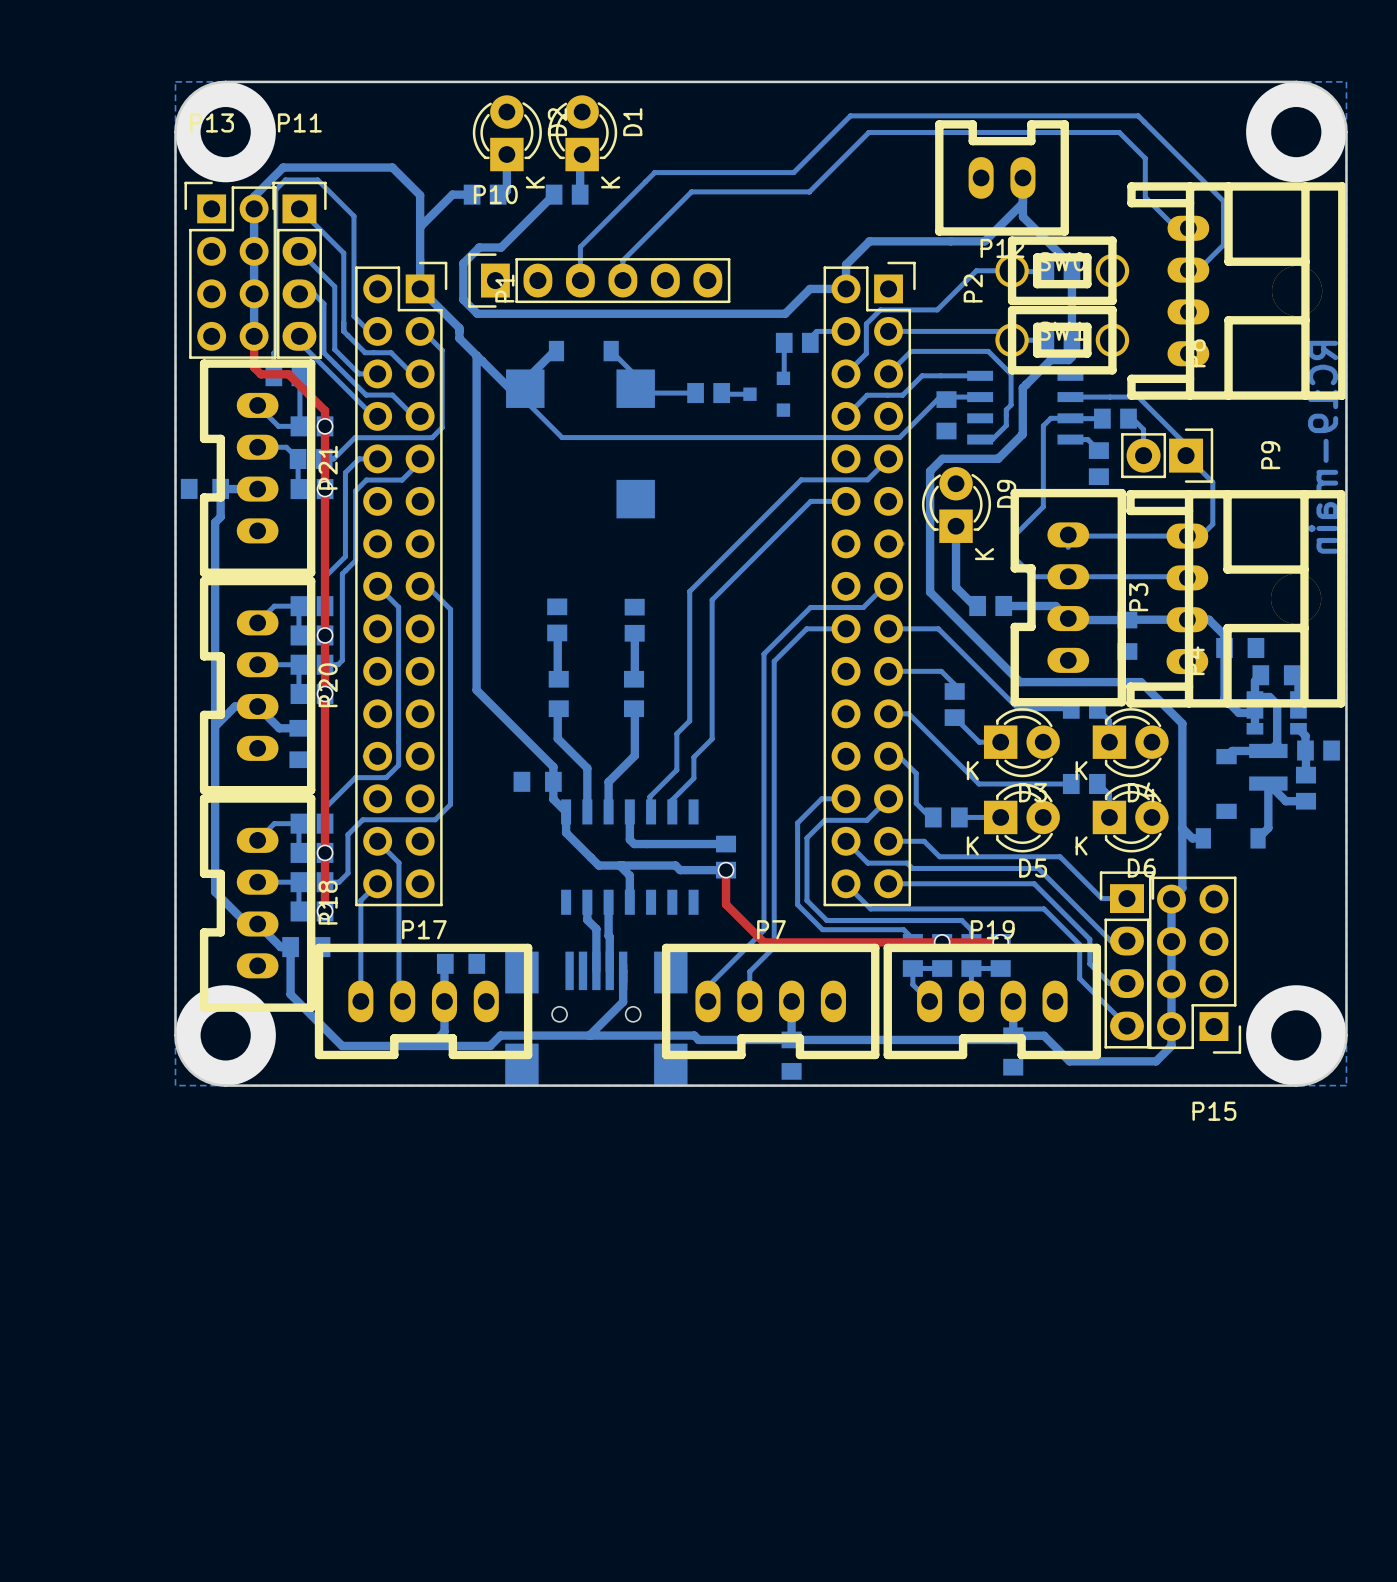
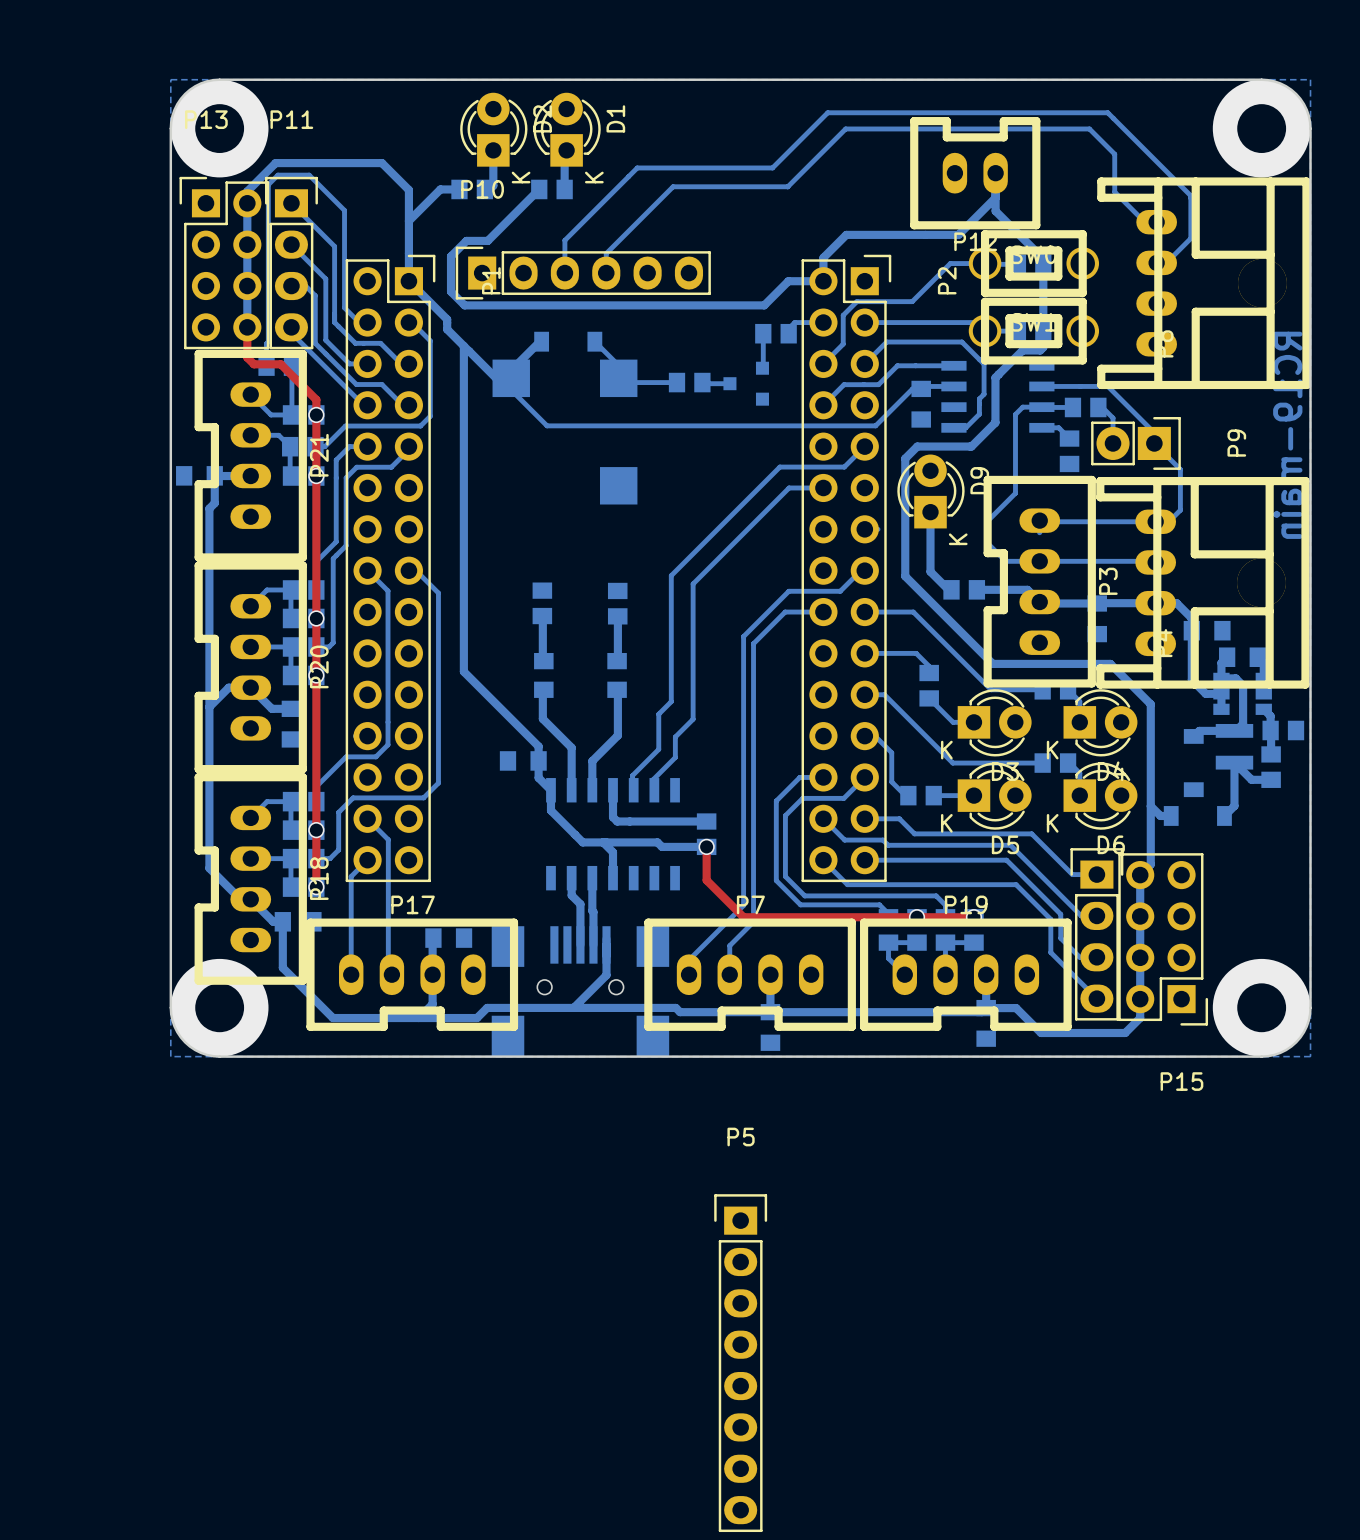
P5: none -> (740, 1363)

